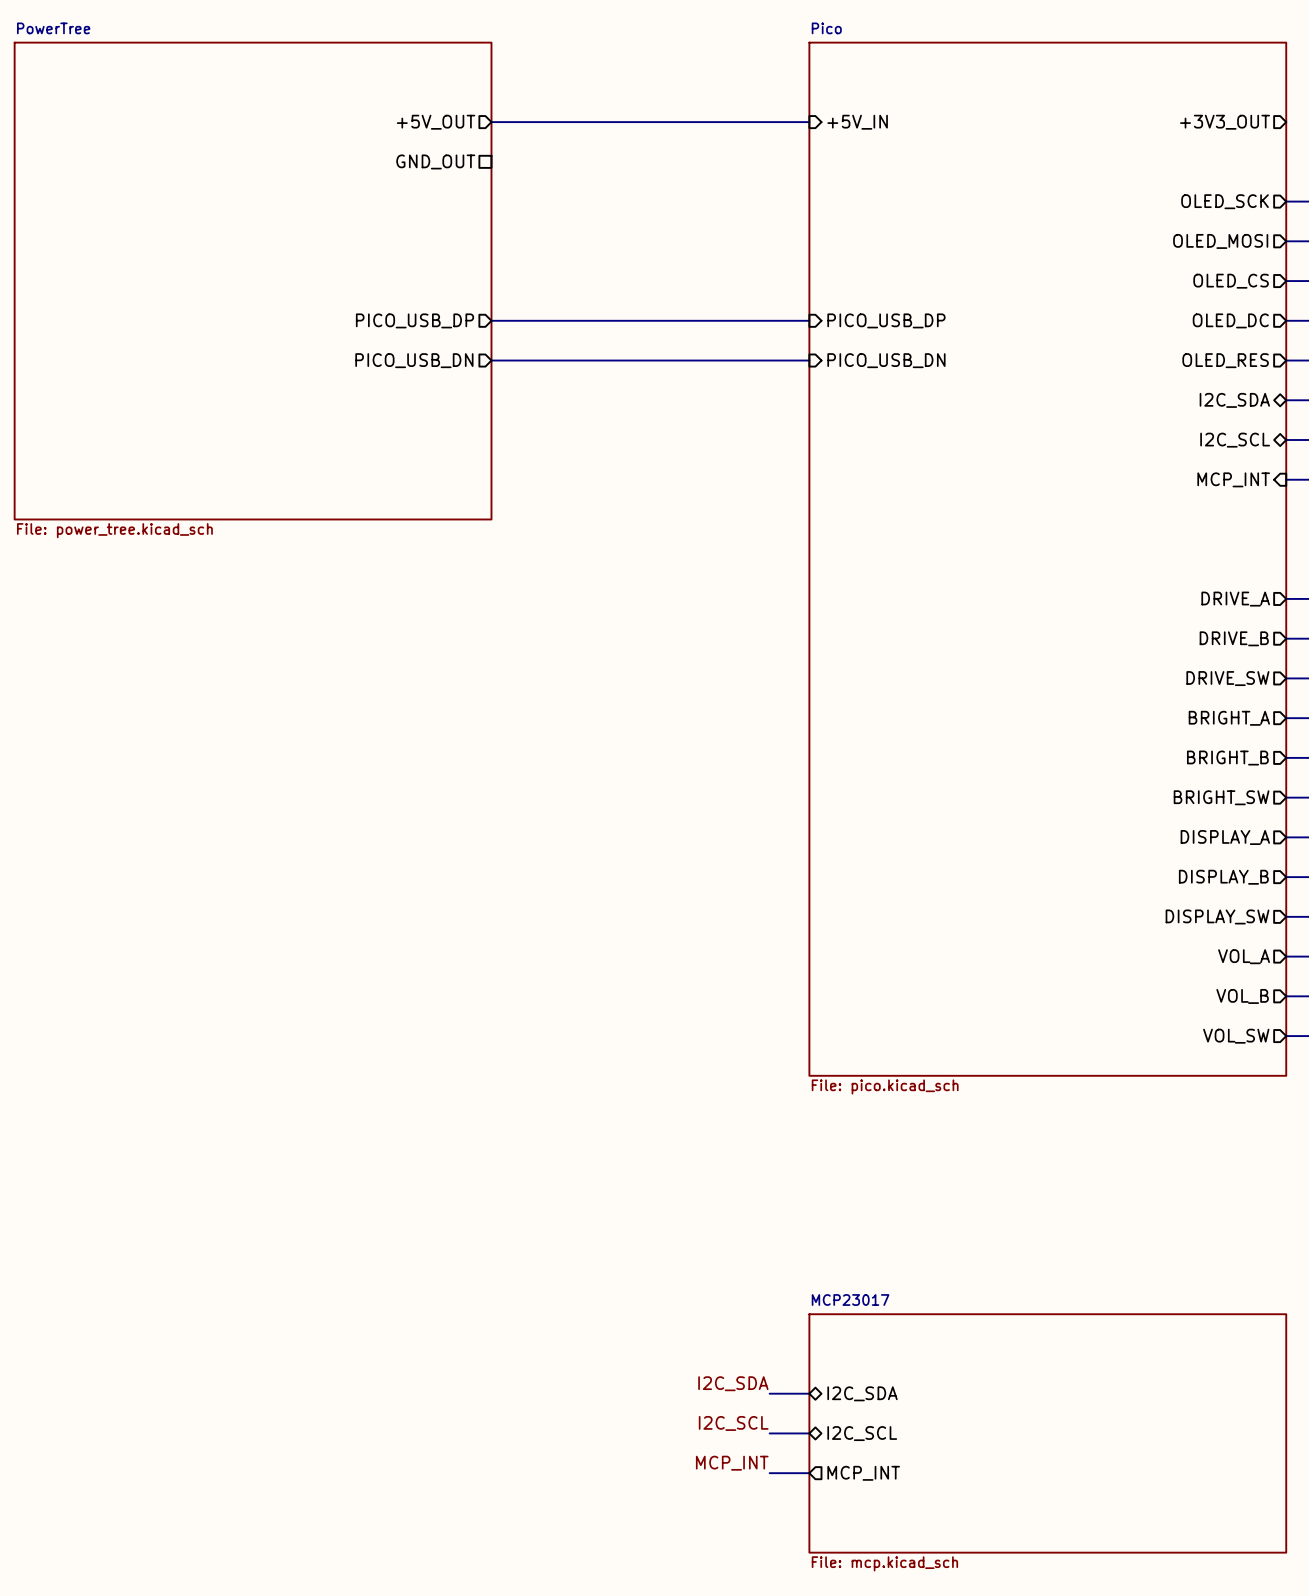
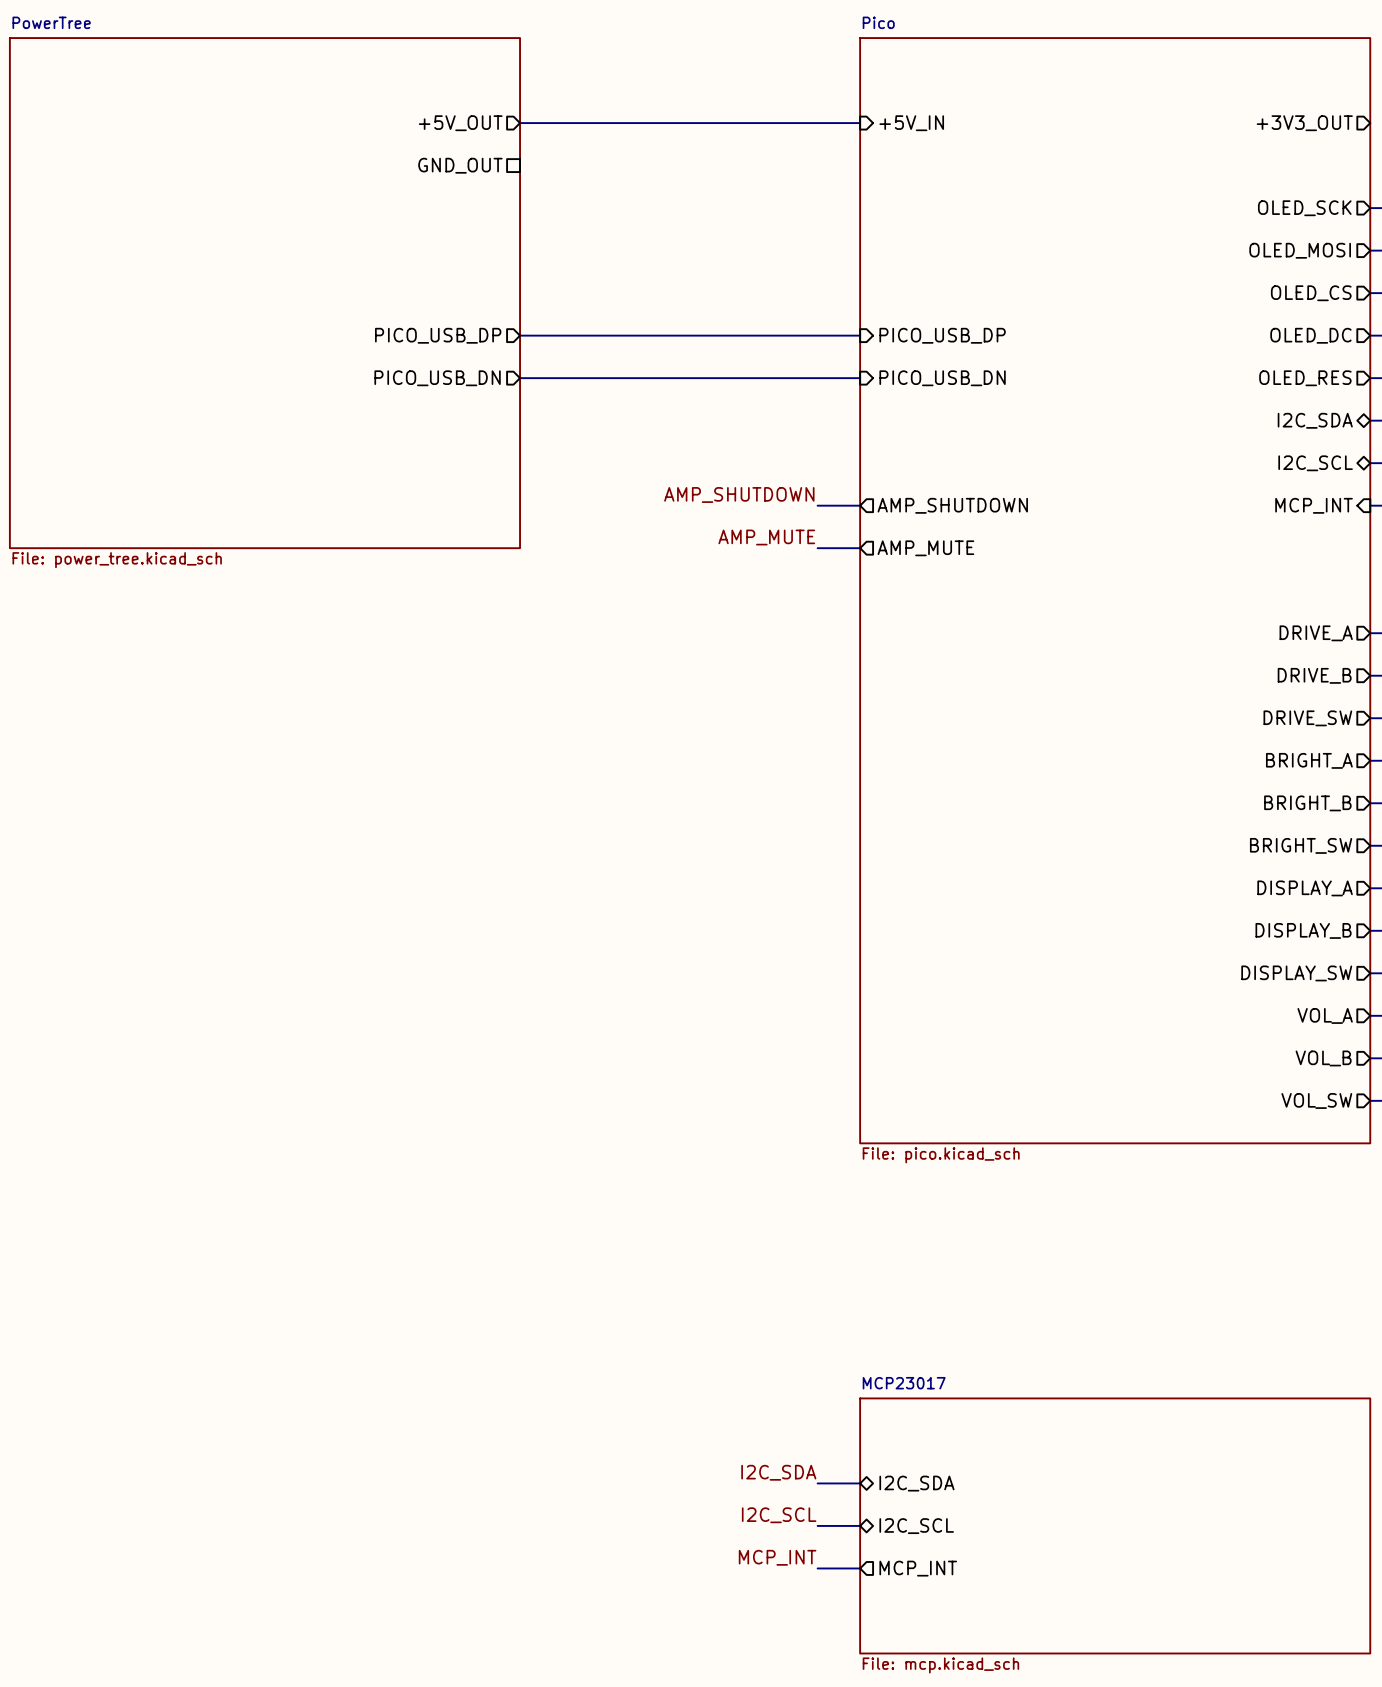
label: none -> AMP_SHUTDOWN (739, 494)
wire: none -> (817, 505) (860, 505)
sheet pin: none -> AMP_SHUTDOWN (952, 505)
label: none -> AMP_MUTE (766, 537)
wire: none -> (817, 548) (860, 548)
sheet pin: none -> AMP_MUTE (925, 548)

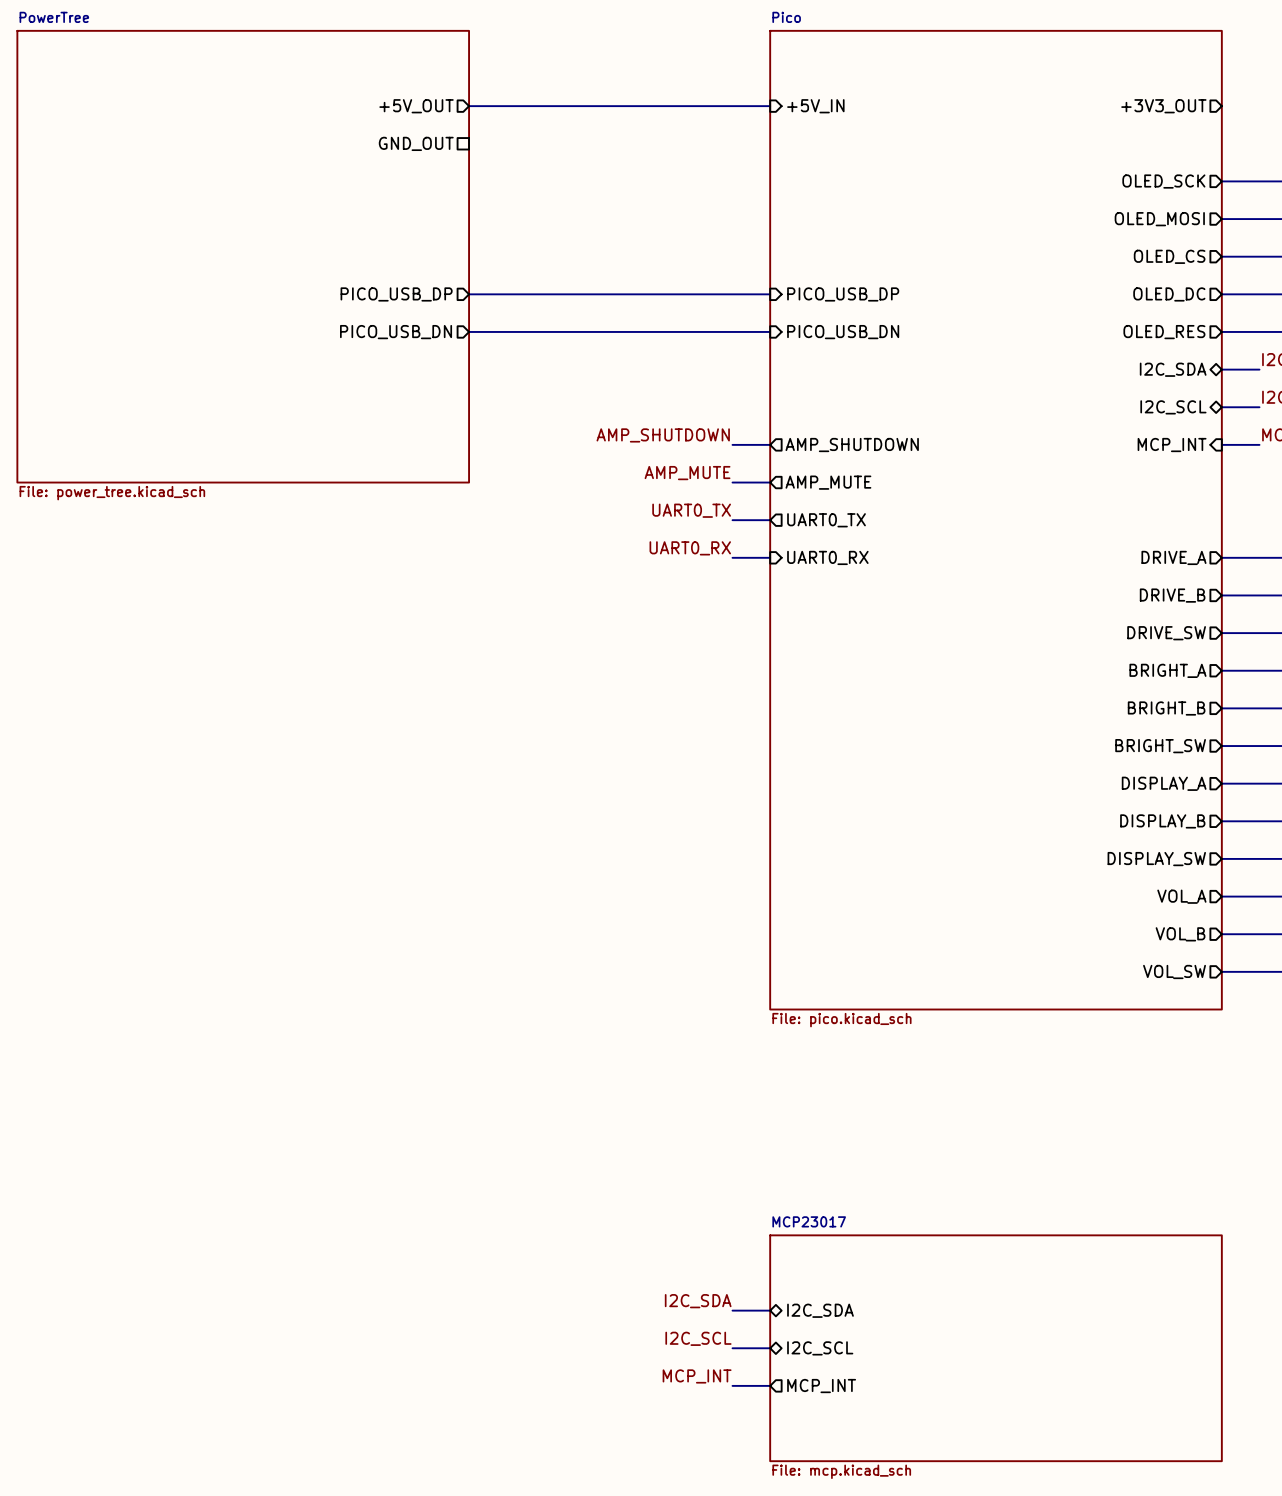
label: none -> UART0_TX (691, 510)
wire: none -> (732, 520) (770, 520)
sheet pin: none -> UART0_TX (826, 520)
label: none -> UART0_RX (690, 548)
wire: none -> (732, 557) (770, 557)
sheet pin: none -> UART0_RX (827, 557)

